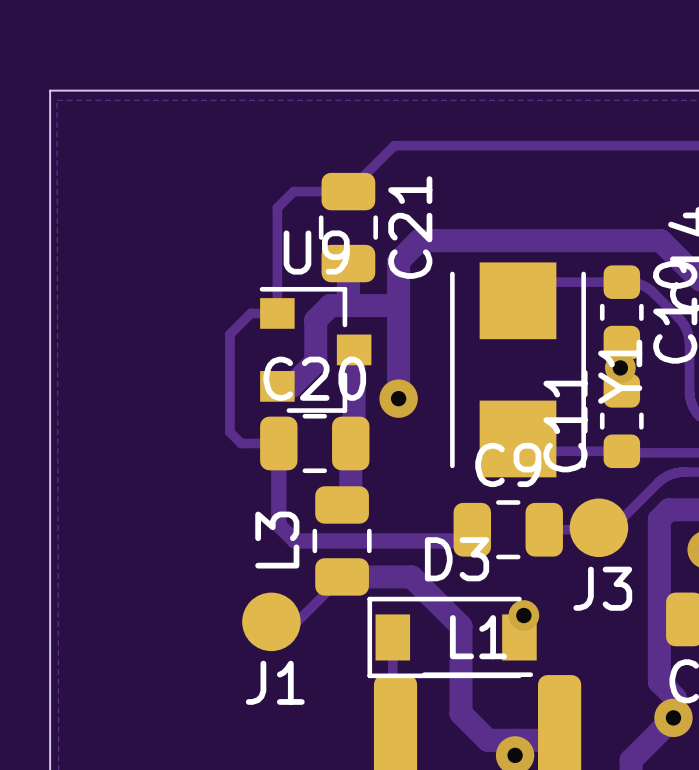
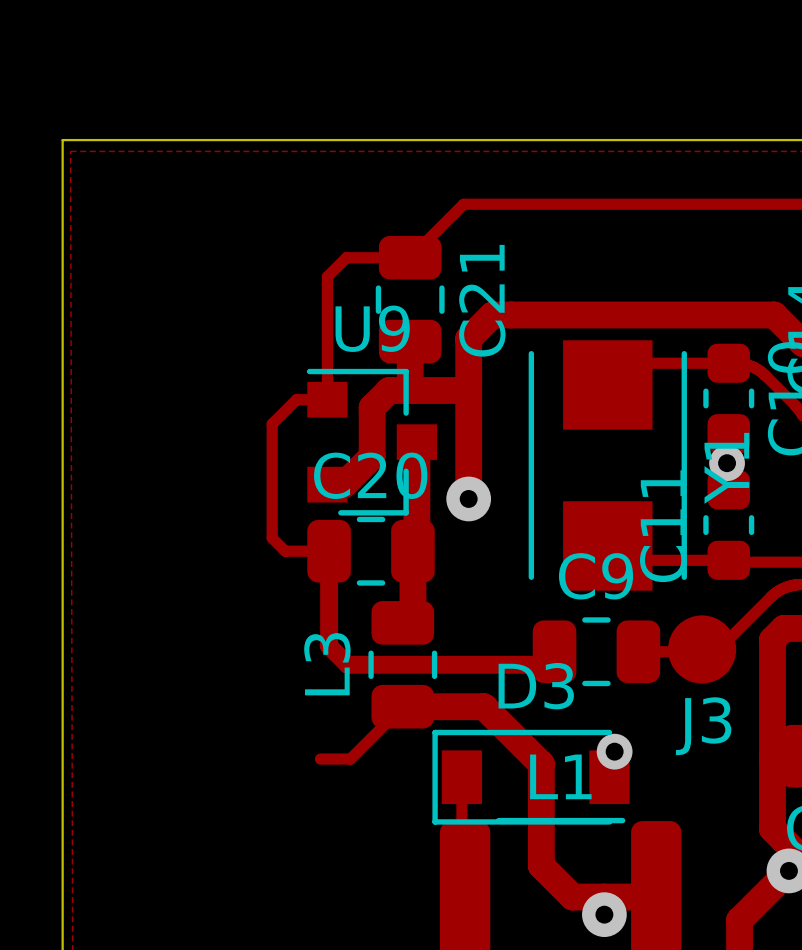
J1: (271, 621) -> none

